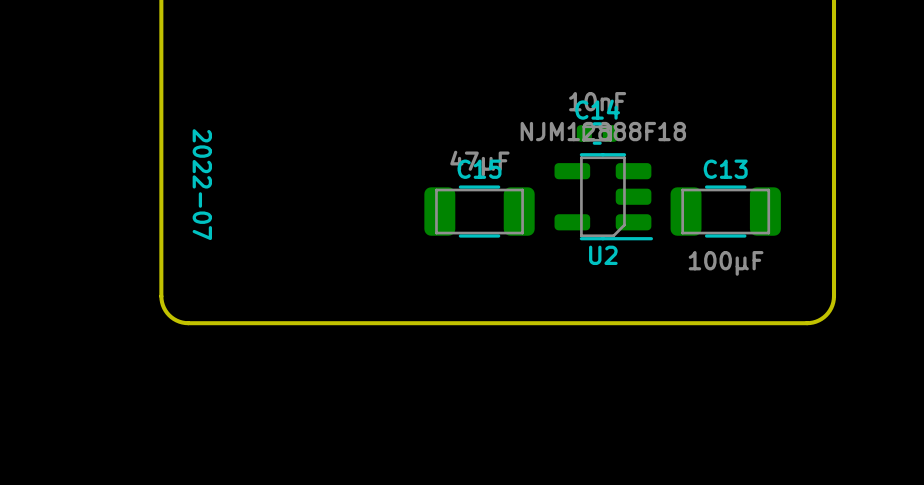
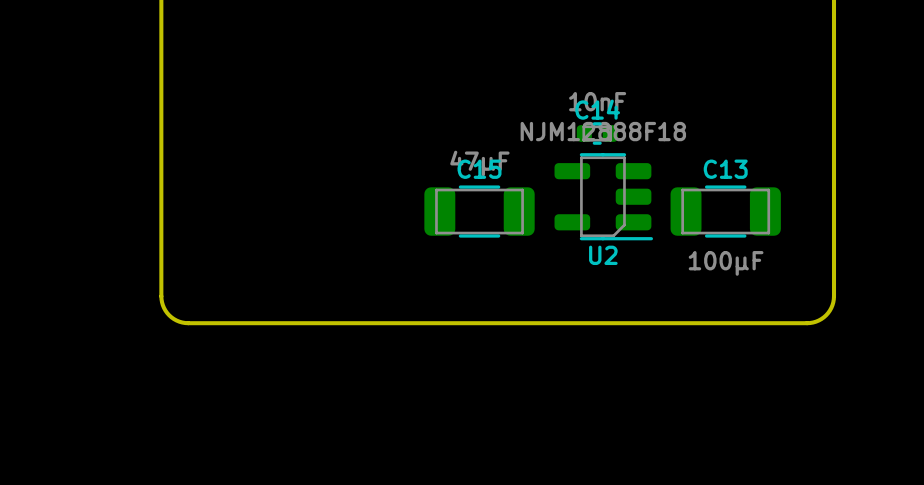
text: 2022-07 (202, 184) -> none

